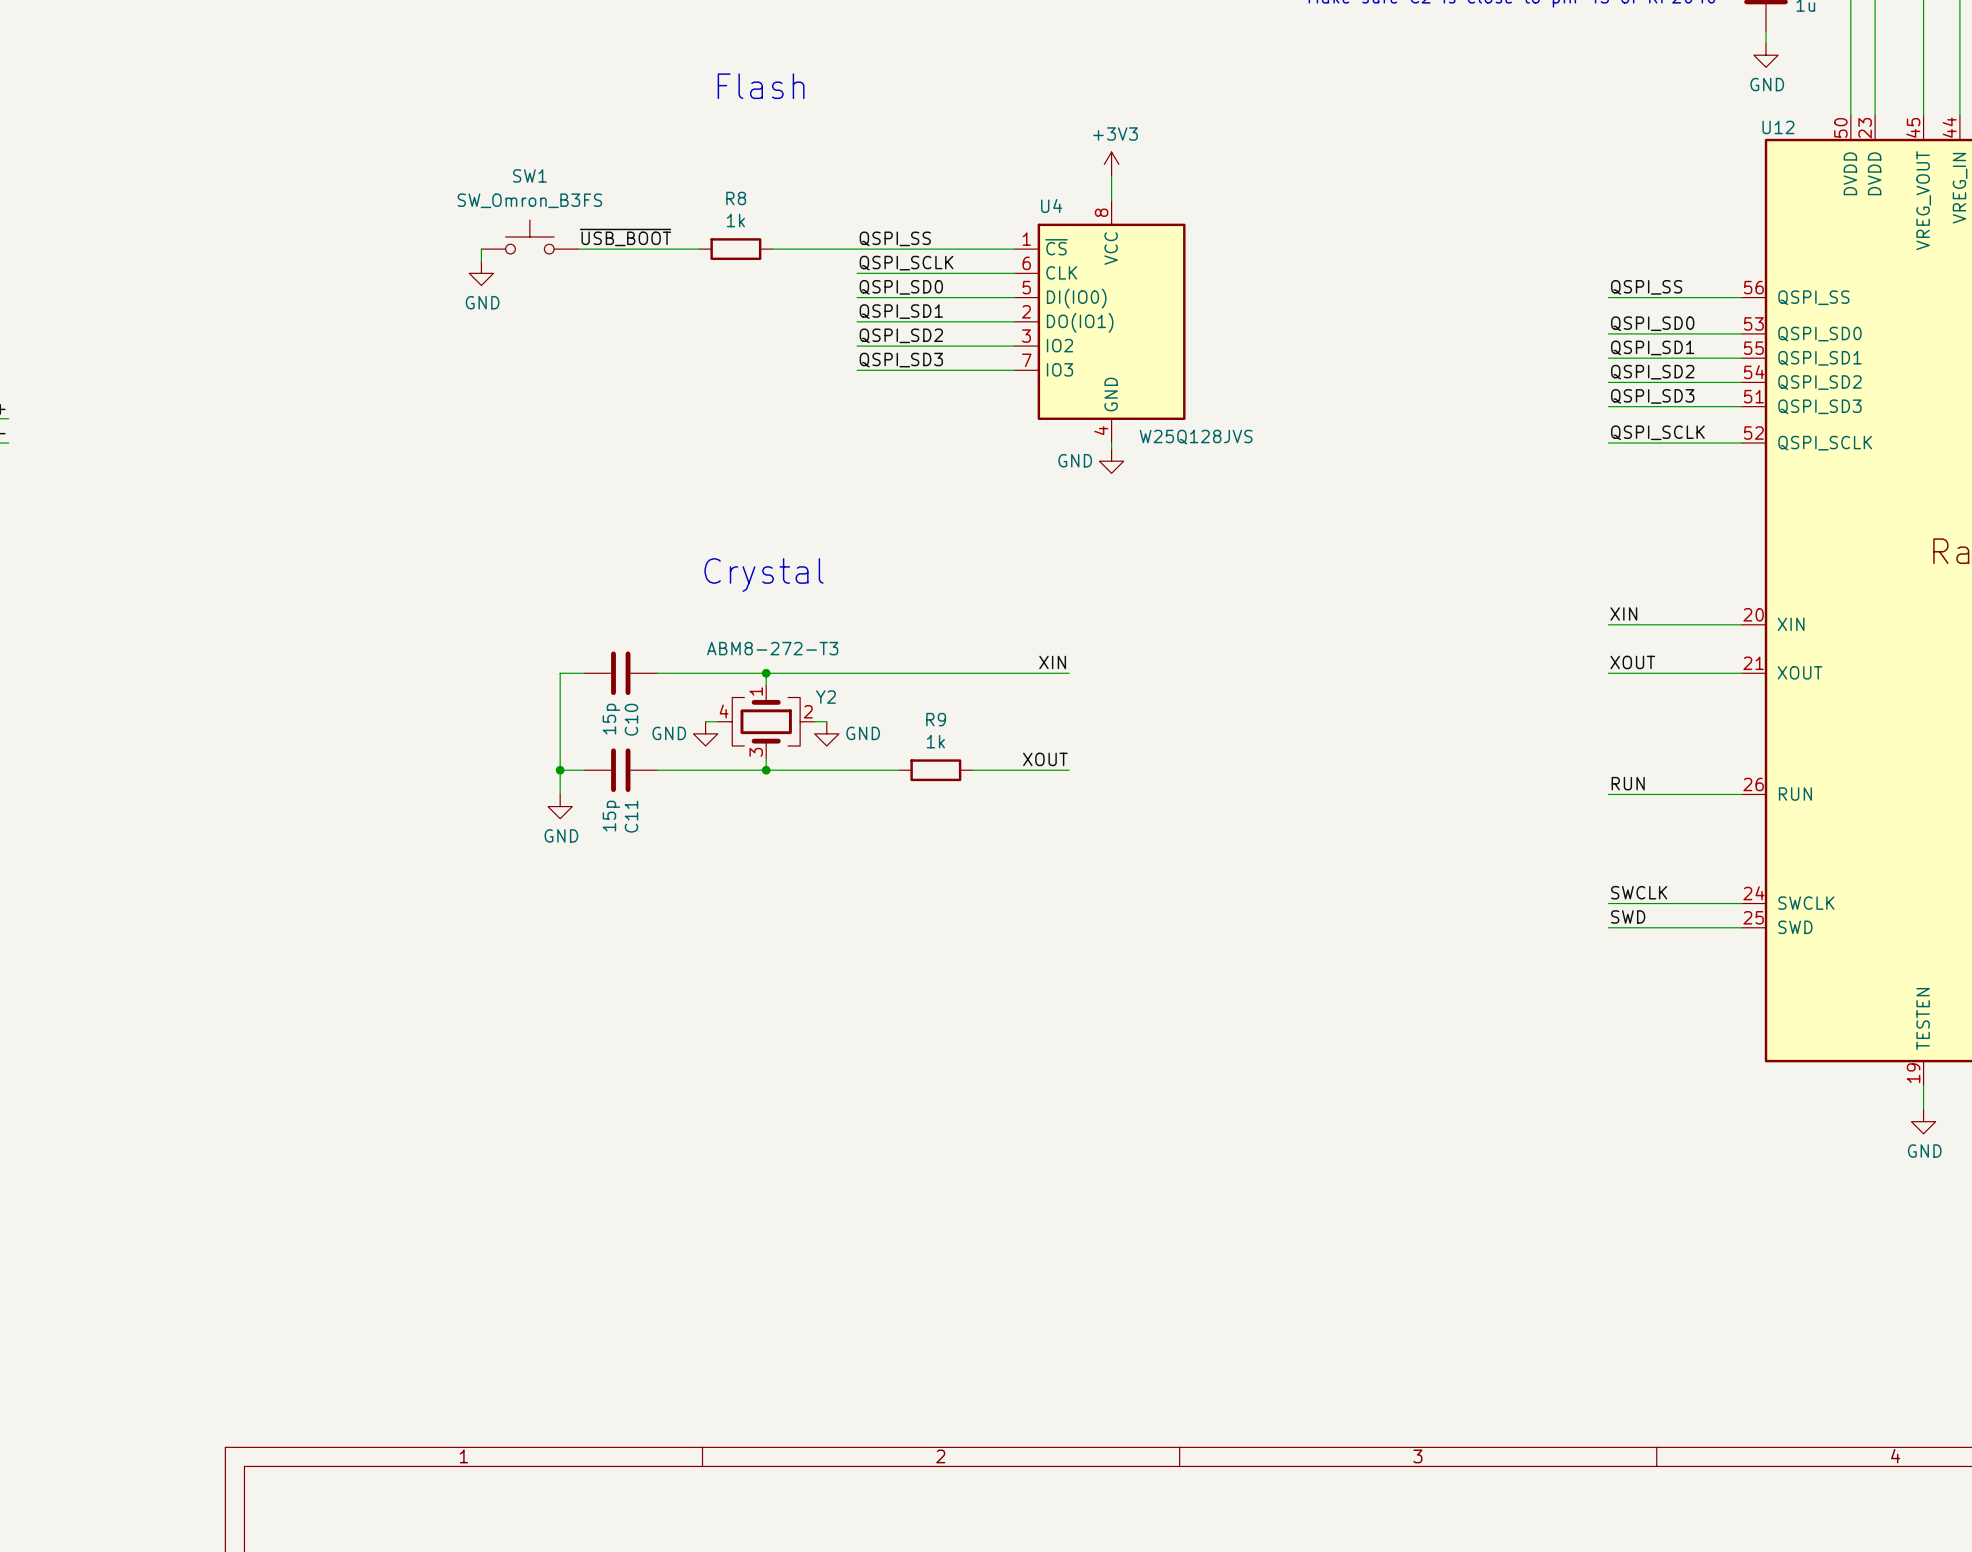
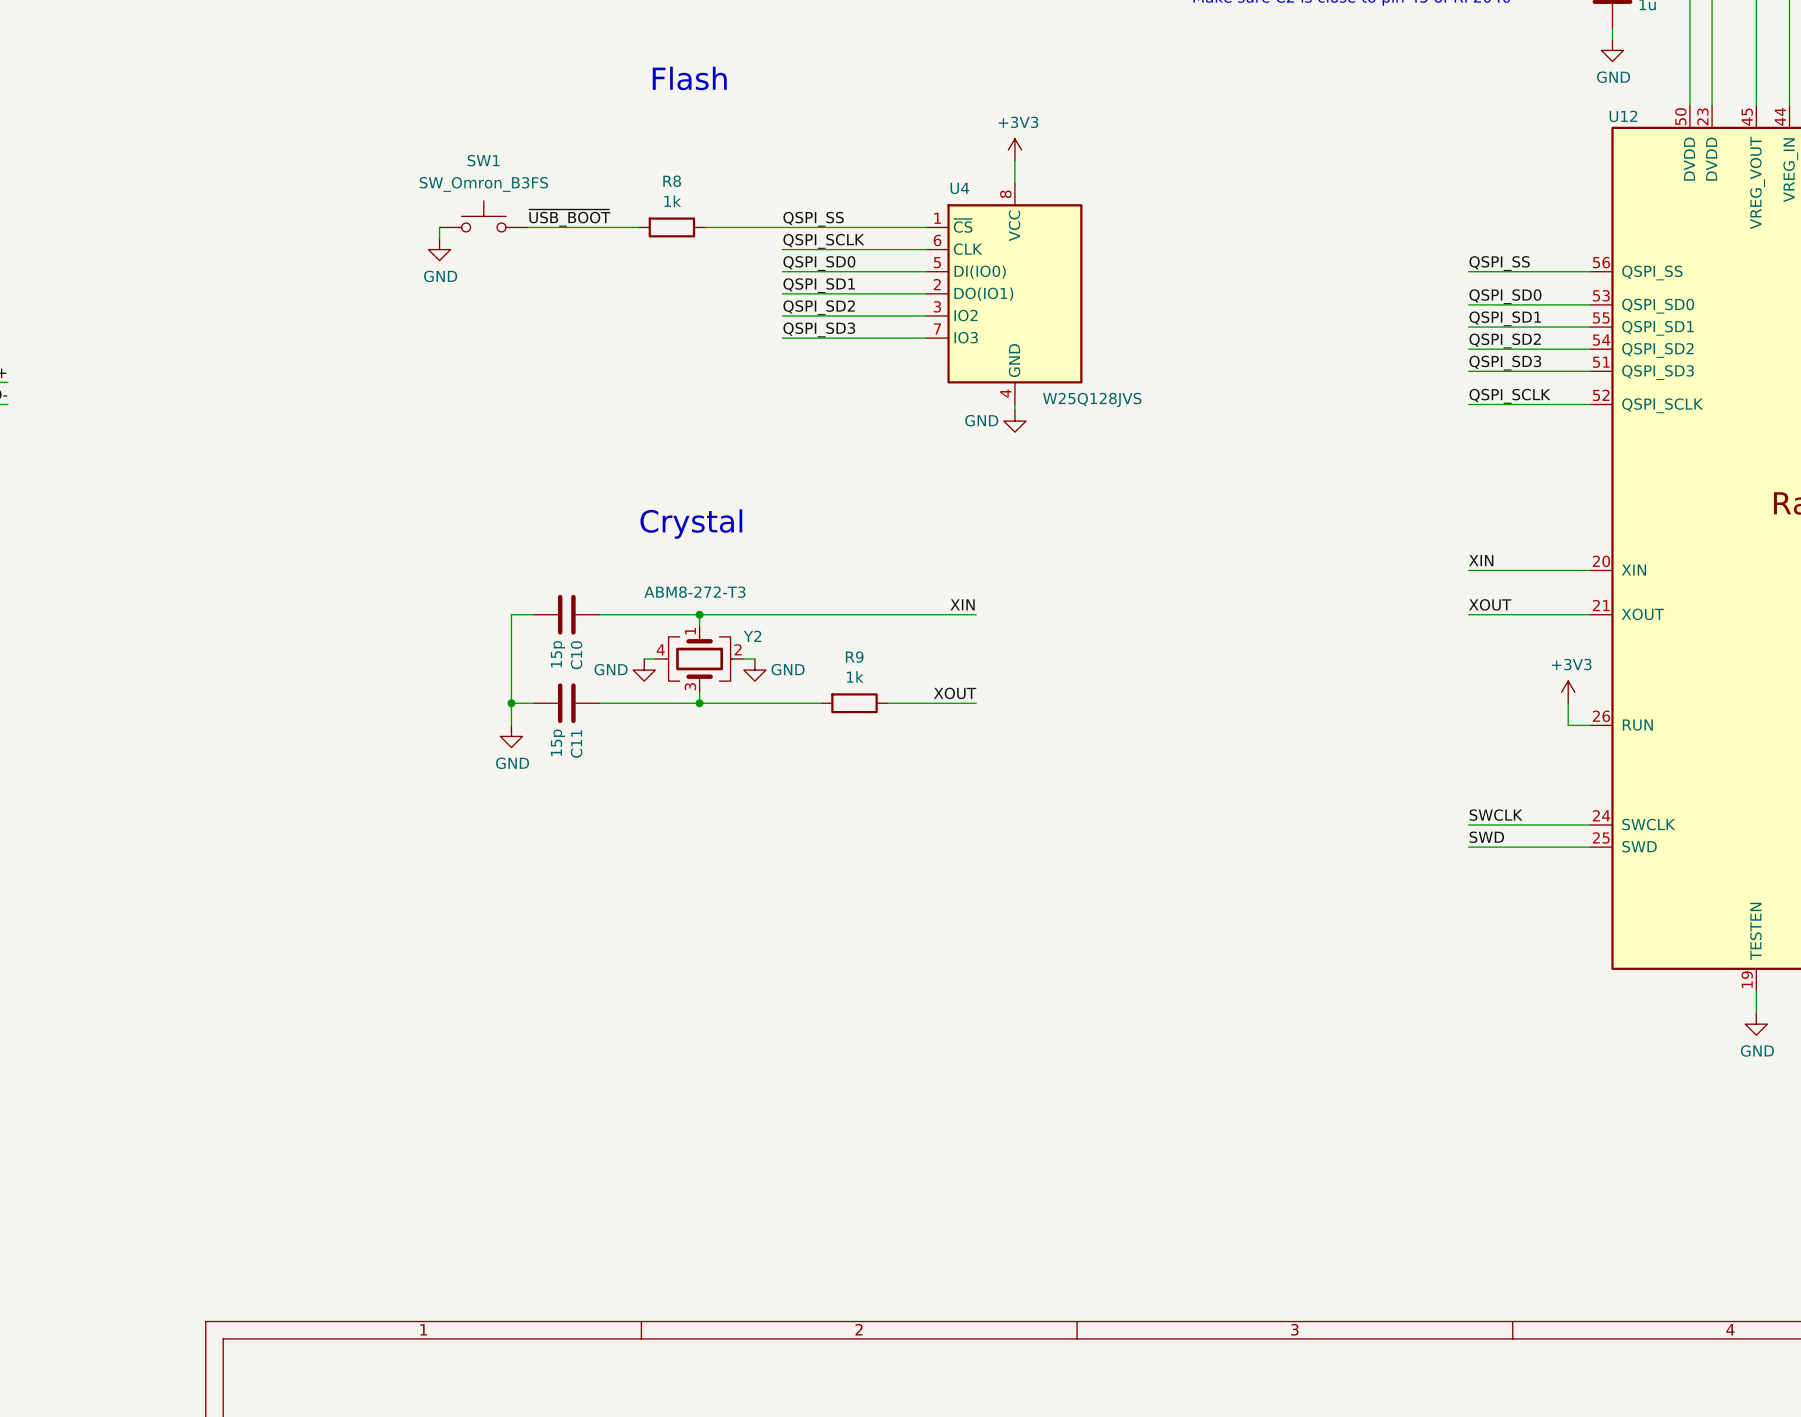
power symbol: none -> +3V3 (1568, 692)
label: RUN (1628, 783) -> none
wire: (1608, 794) (1717, 794) -> (1568, 703) (1568, 725)

